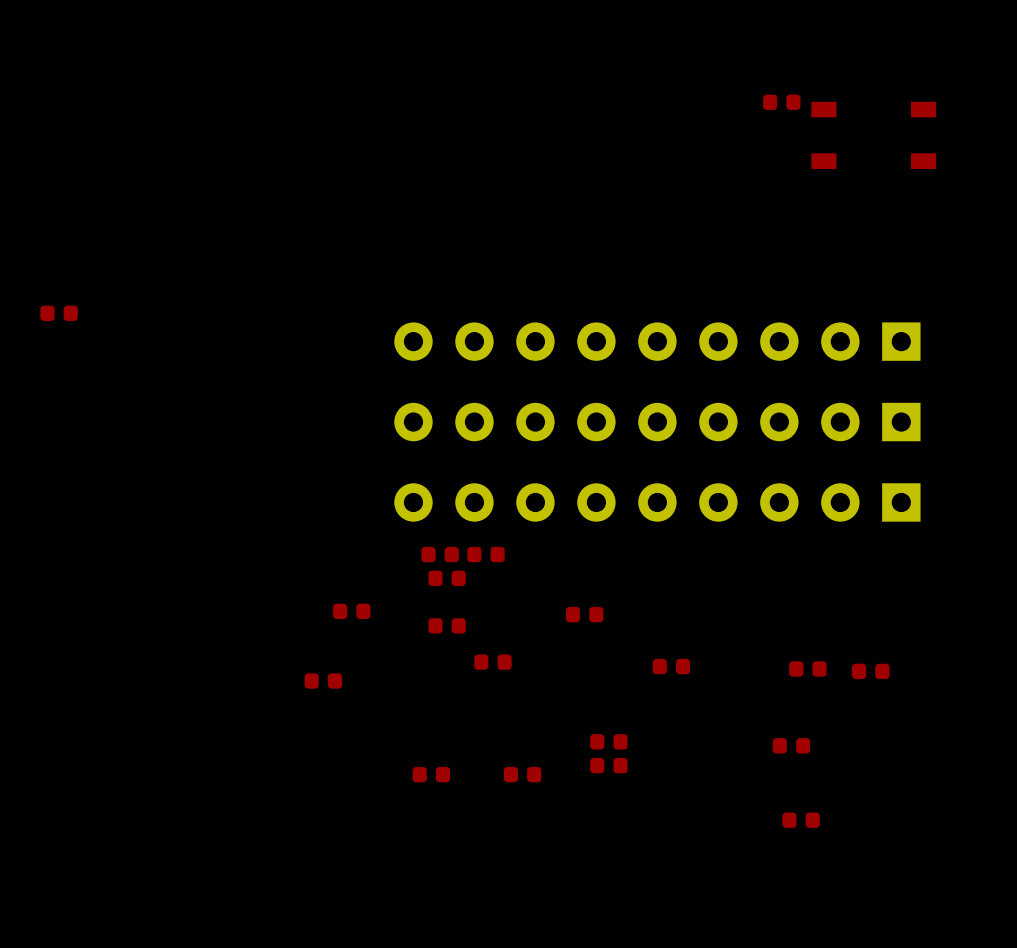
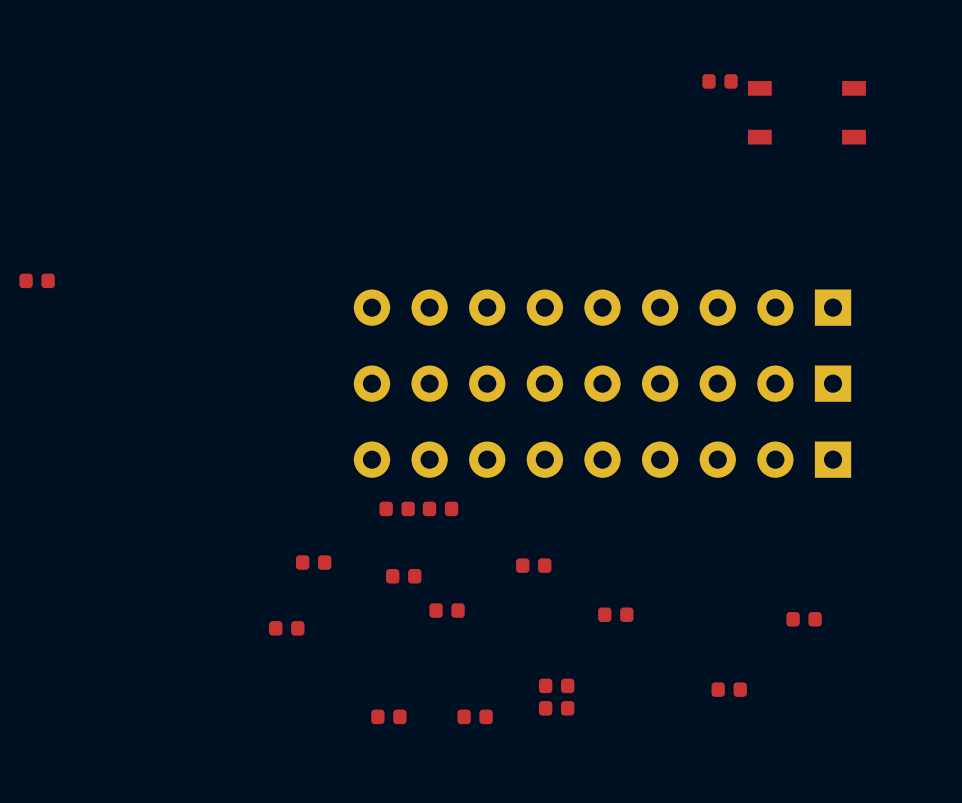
part: (447, 578) -> none
part: (807, 668) -> none
part: (801, 820) -> none

